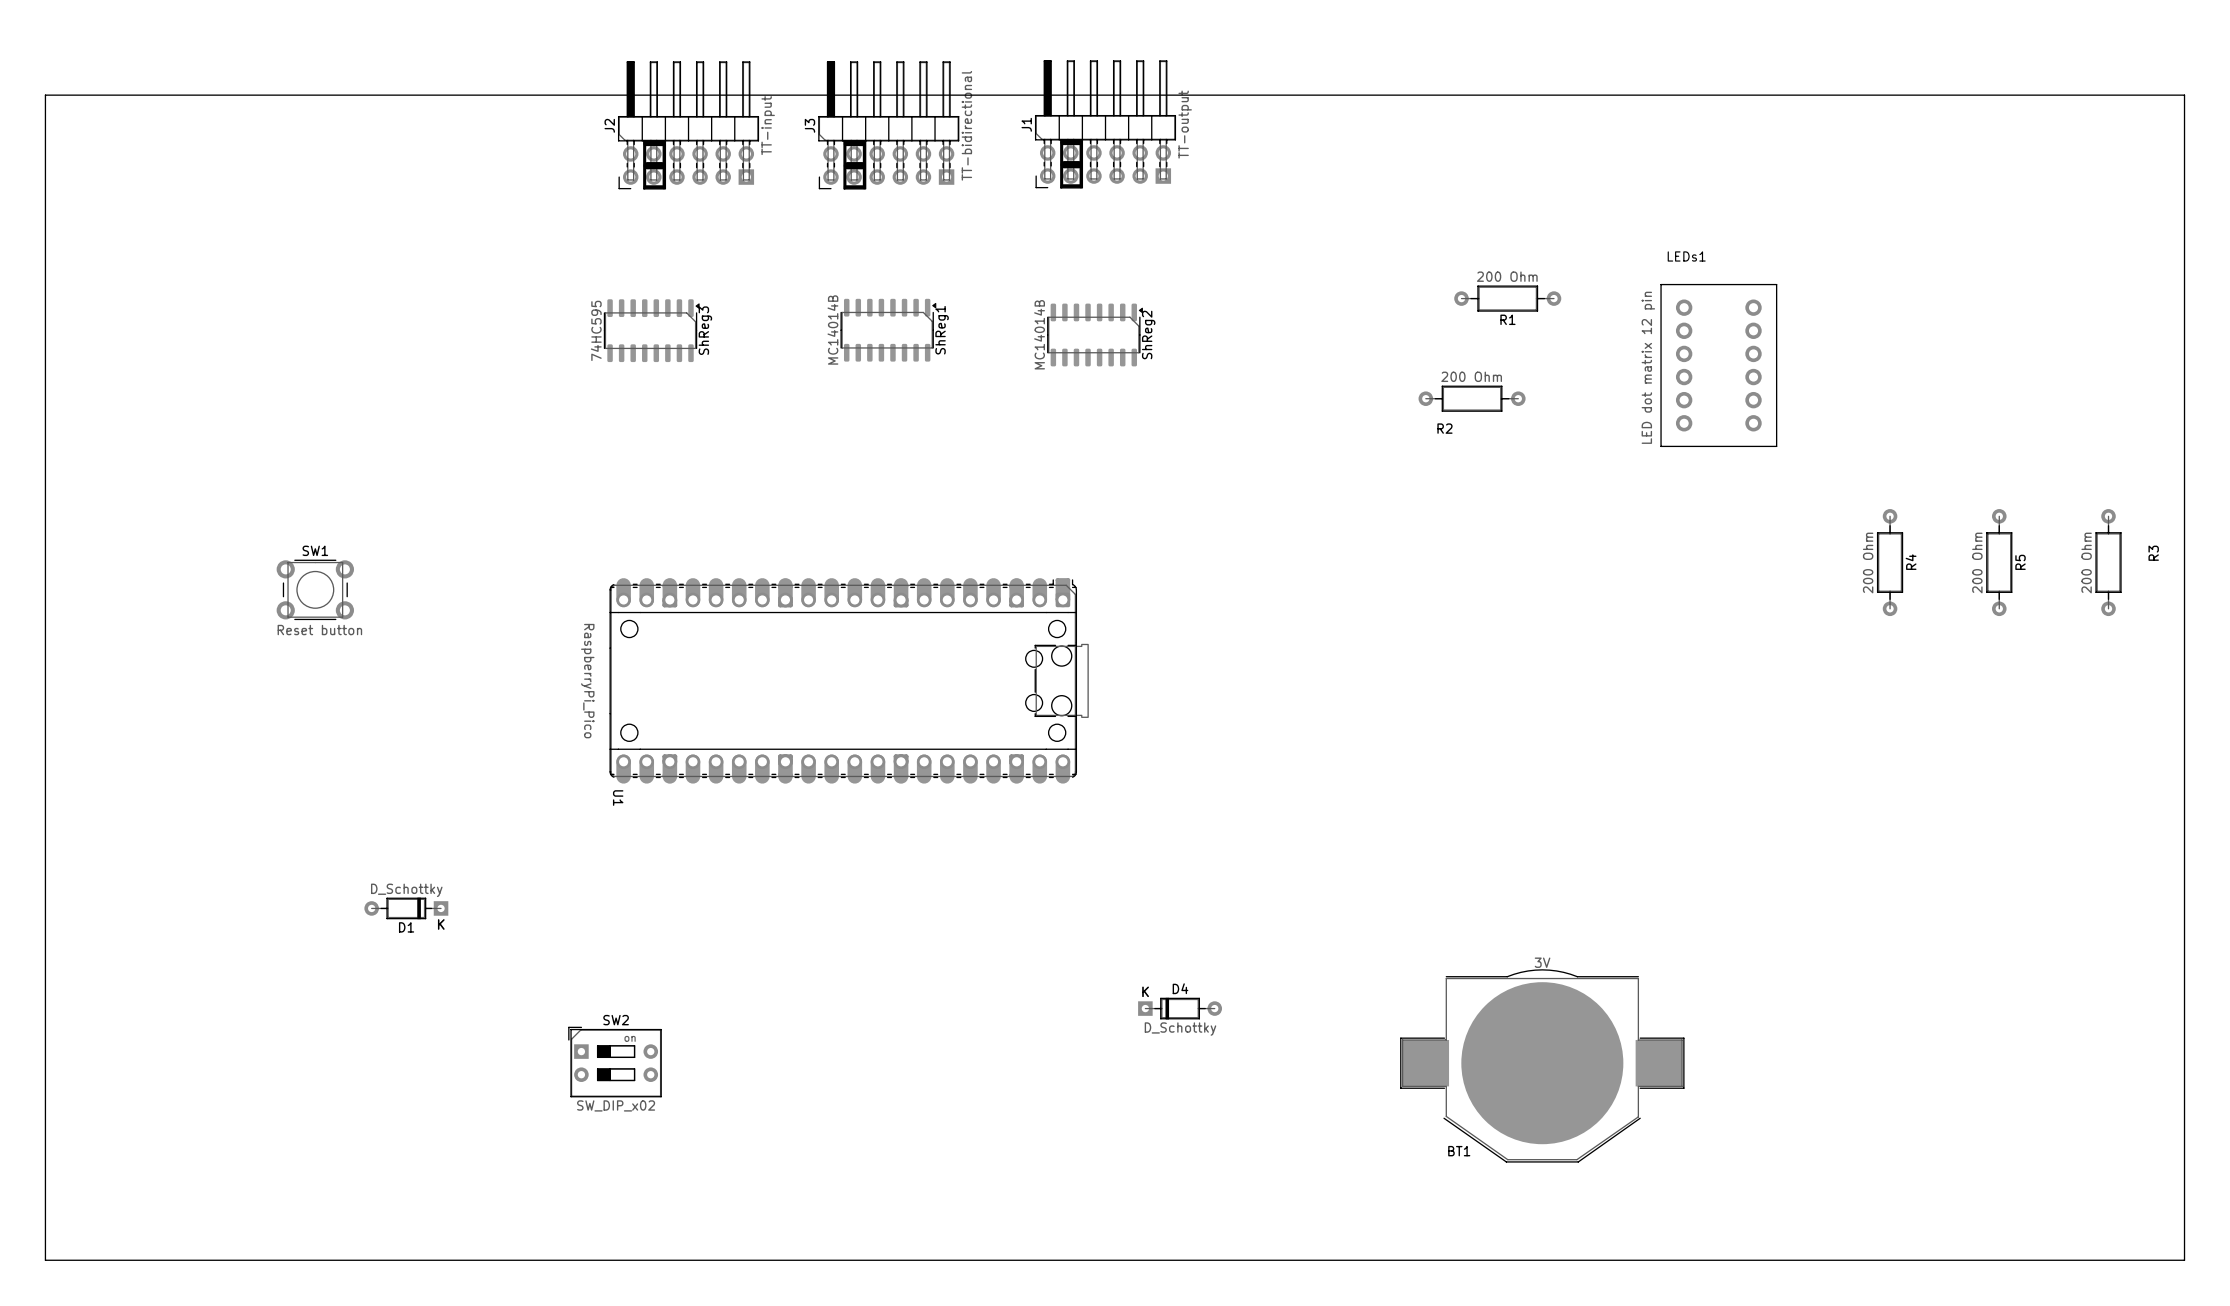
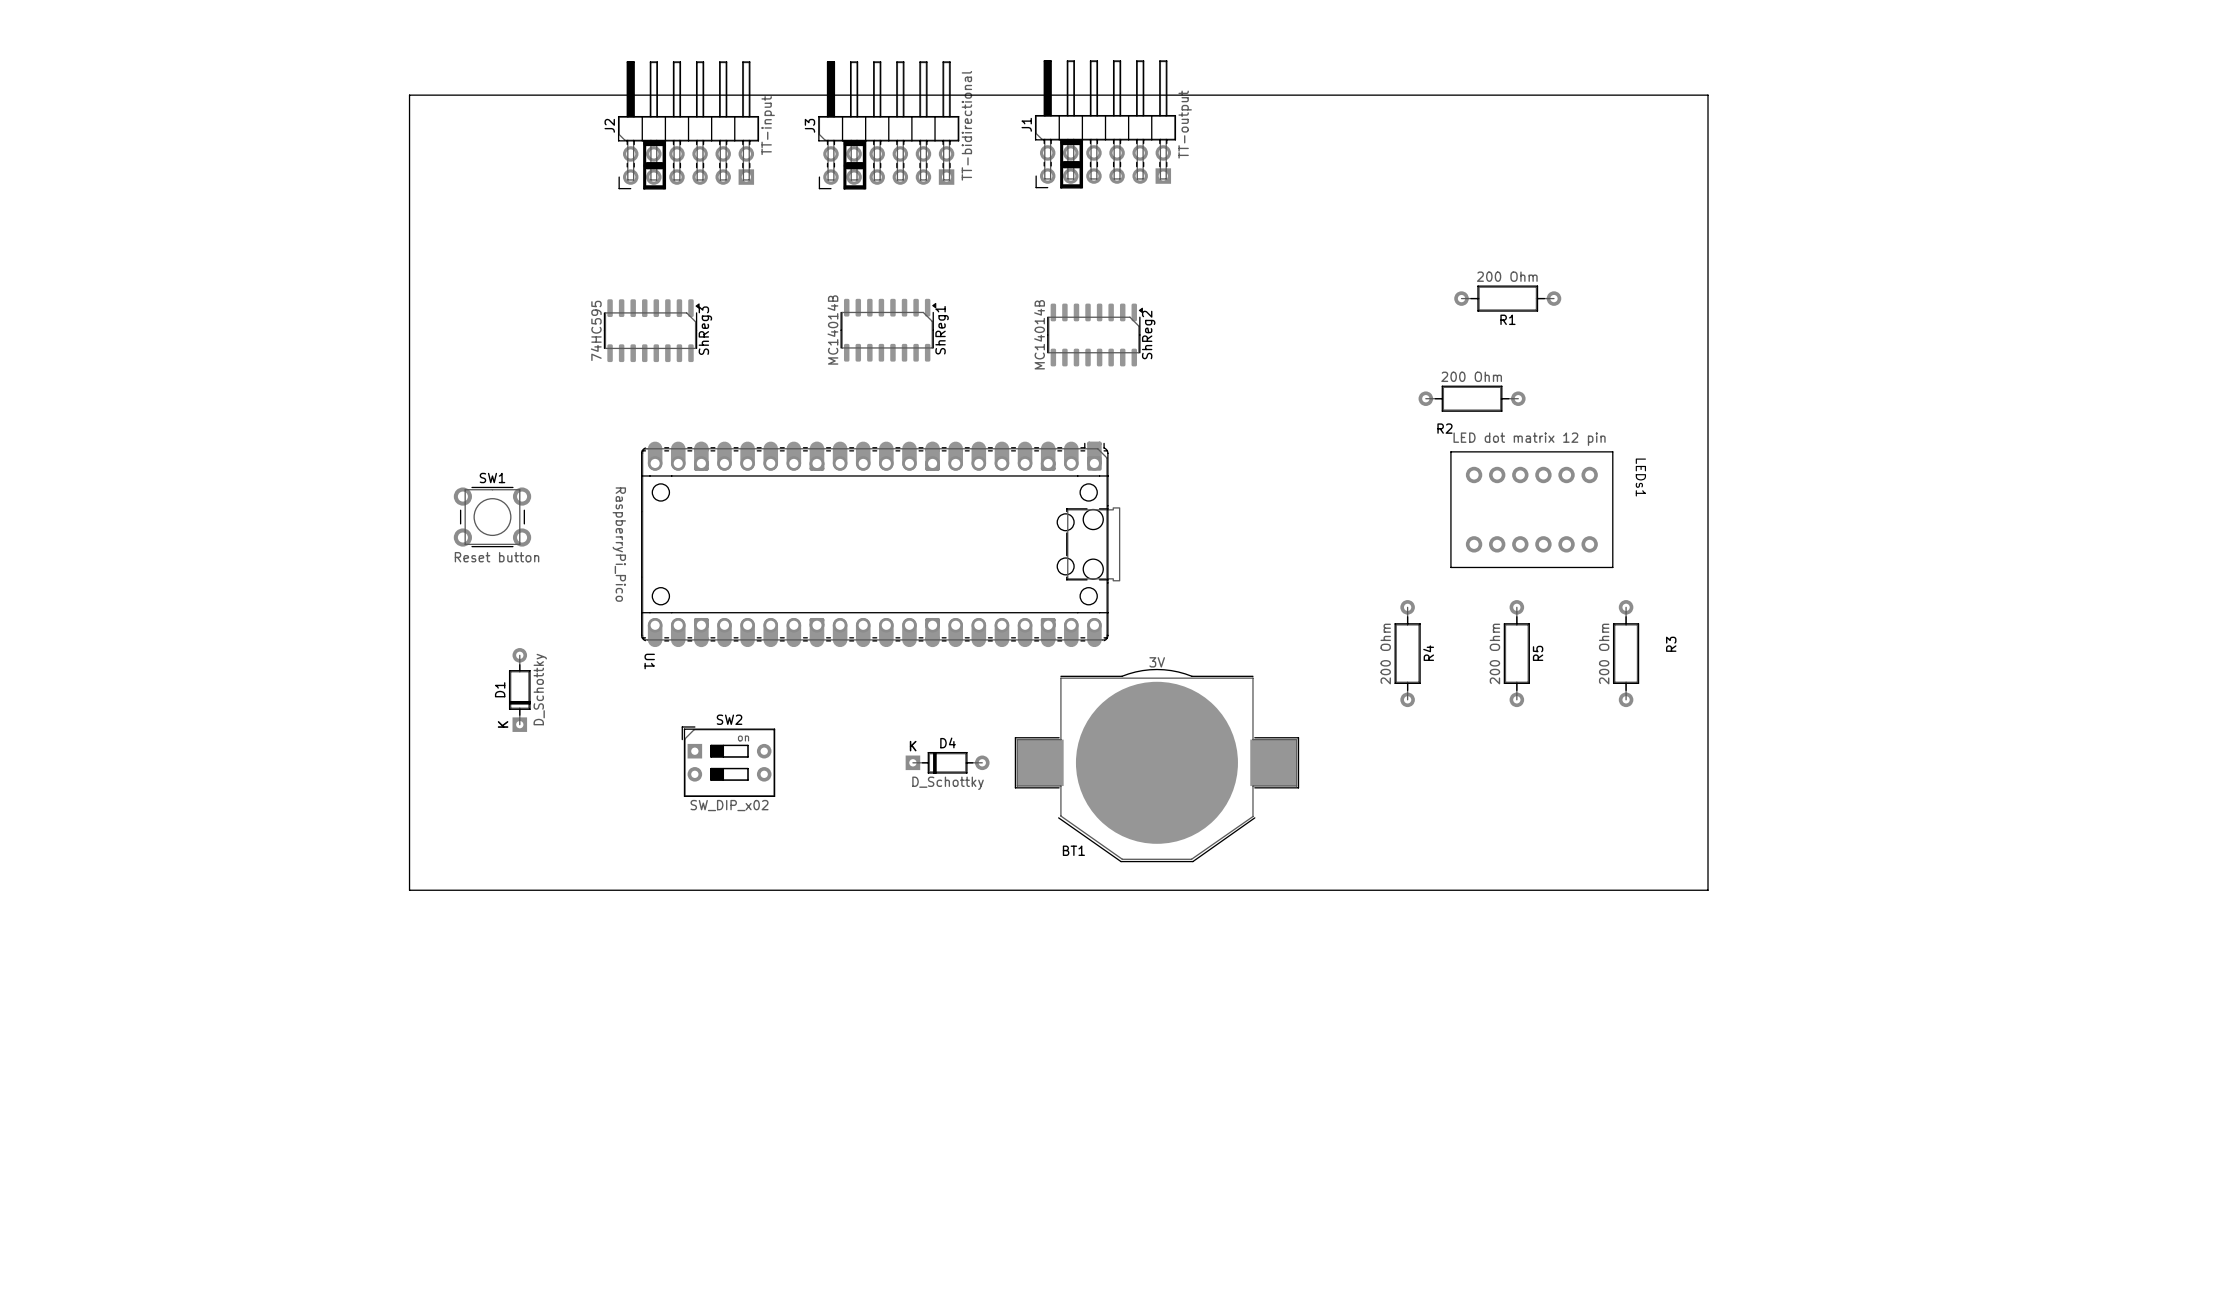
board edge: (409, 95) (45, 95) (45, 1260) (2184, 1260) (2184, 95) (1708, 95) -> (409, 95) (409, 890) (1708, 890) (1708, 95)
LEDs1 rotation: 0° (1718, 365) -> 90° clockwise (1531, 509)
LEDs1 position: (1718, 365) -> (1531, 509)
R4 position: (1890, 562) -> (1407, 653)
R5 position: (1999, 562) -> (1516, 653)
R3 position: (2108, 562) -> (1626, 653)
SW1 position: (315, 589) -> (492, 517)
U1 position: (849, 680) -> (880, 544)
D1 rotation: 0° (406, 908) -> 90° clockwise (519, 689)
D1 position: (406, 908) -> (519, 689)
D4 position: (1180, 1008) -> (947, 762)
SW2 position: (615, 1062) -> (728, 761)
BT1 position: (1542, 1065) -> (1156, 765)

